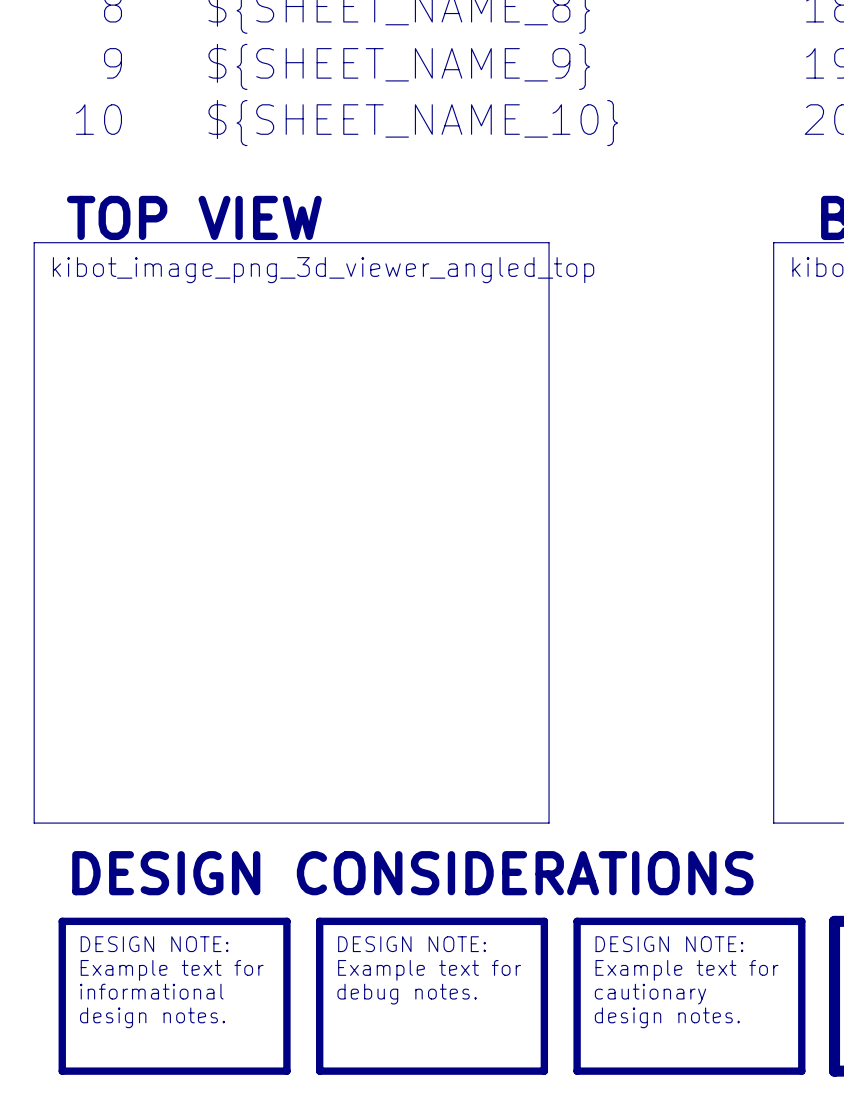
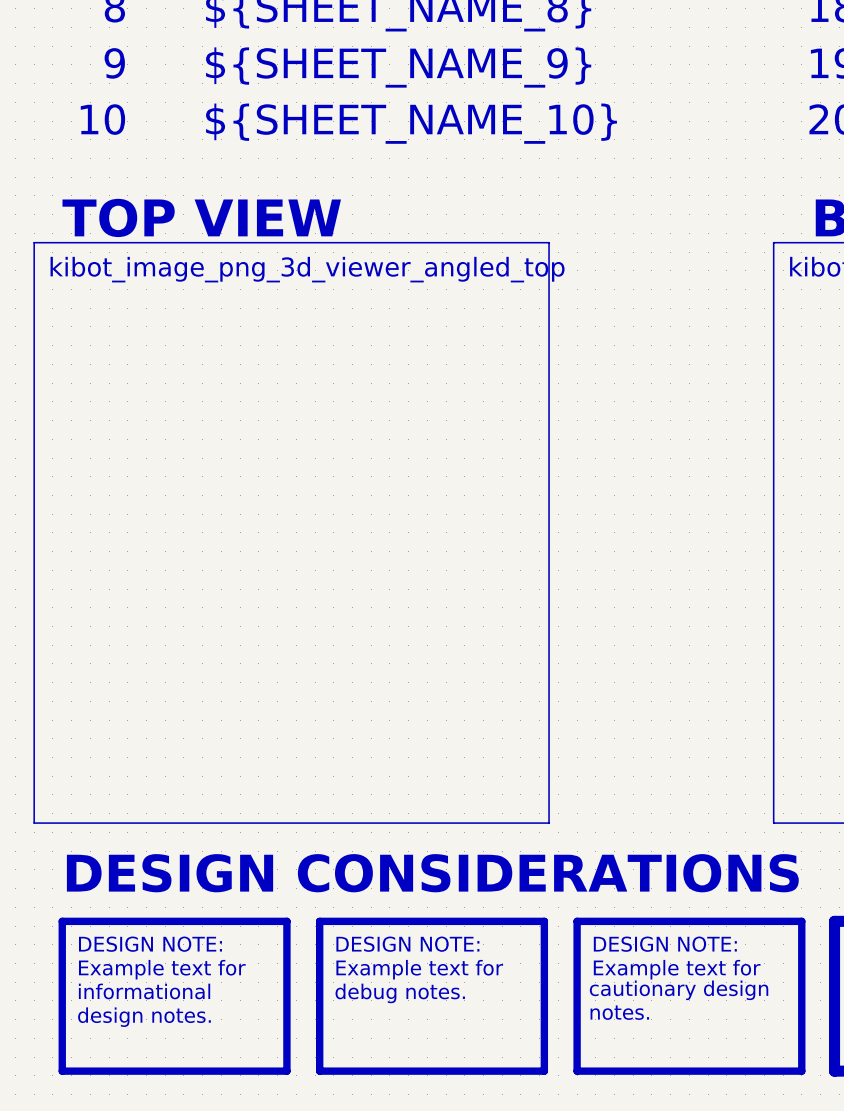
text: cautionary (650, 994) -> cautionary design (679, 990)
text: design notes. (667, 1017) -> notes. (619, 1012)

